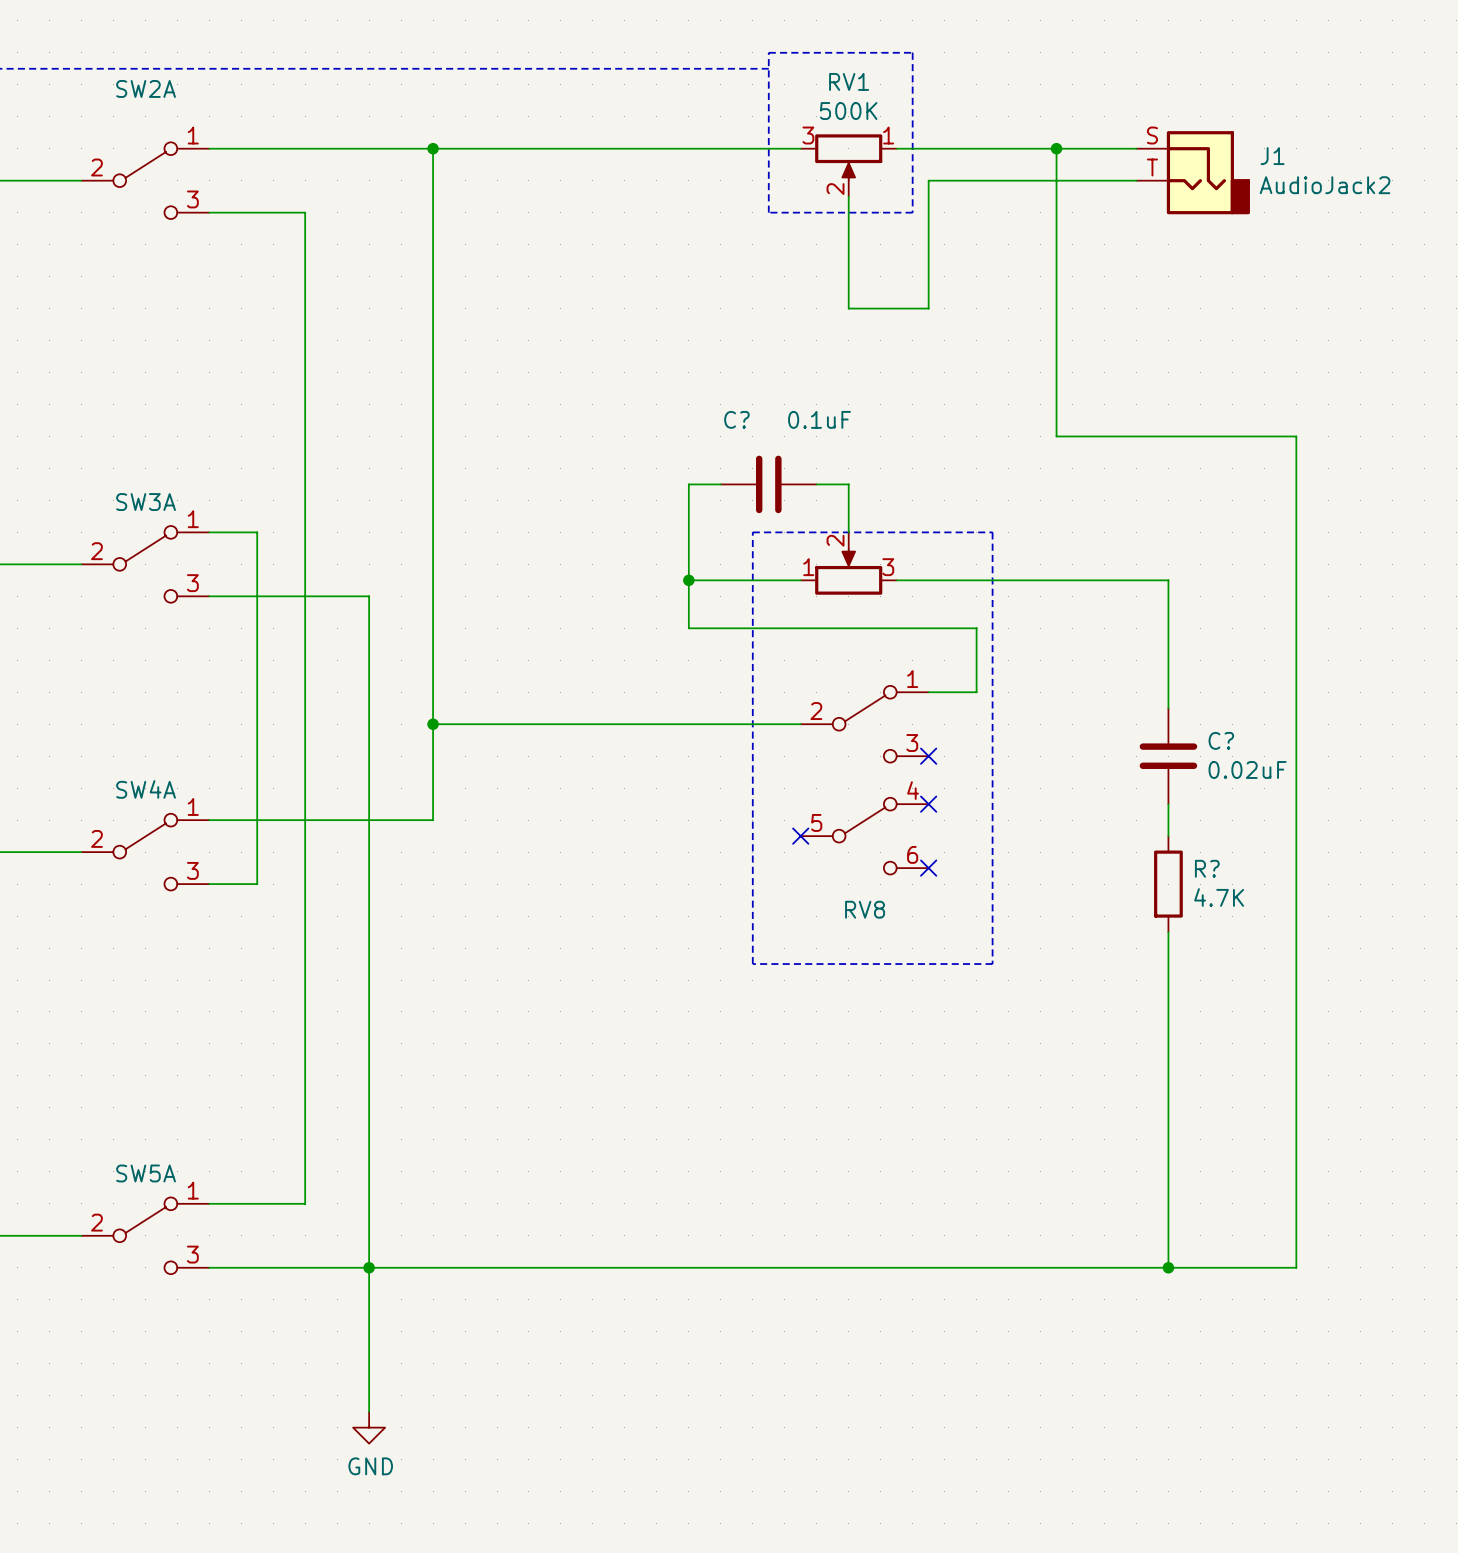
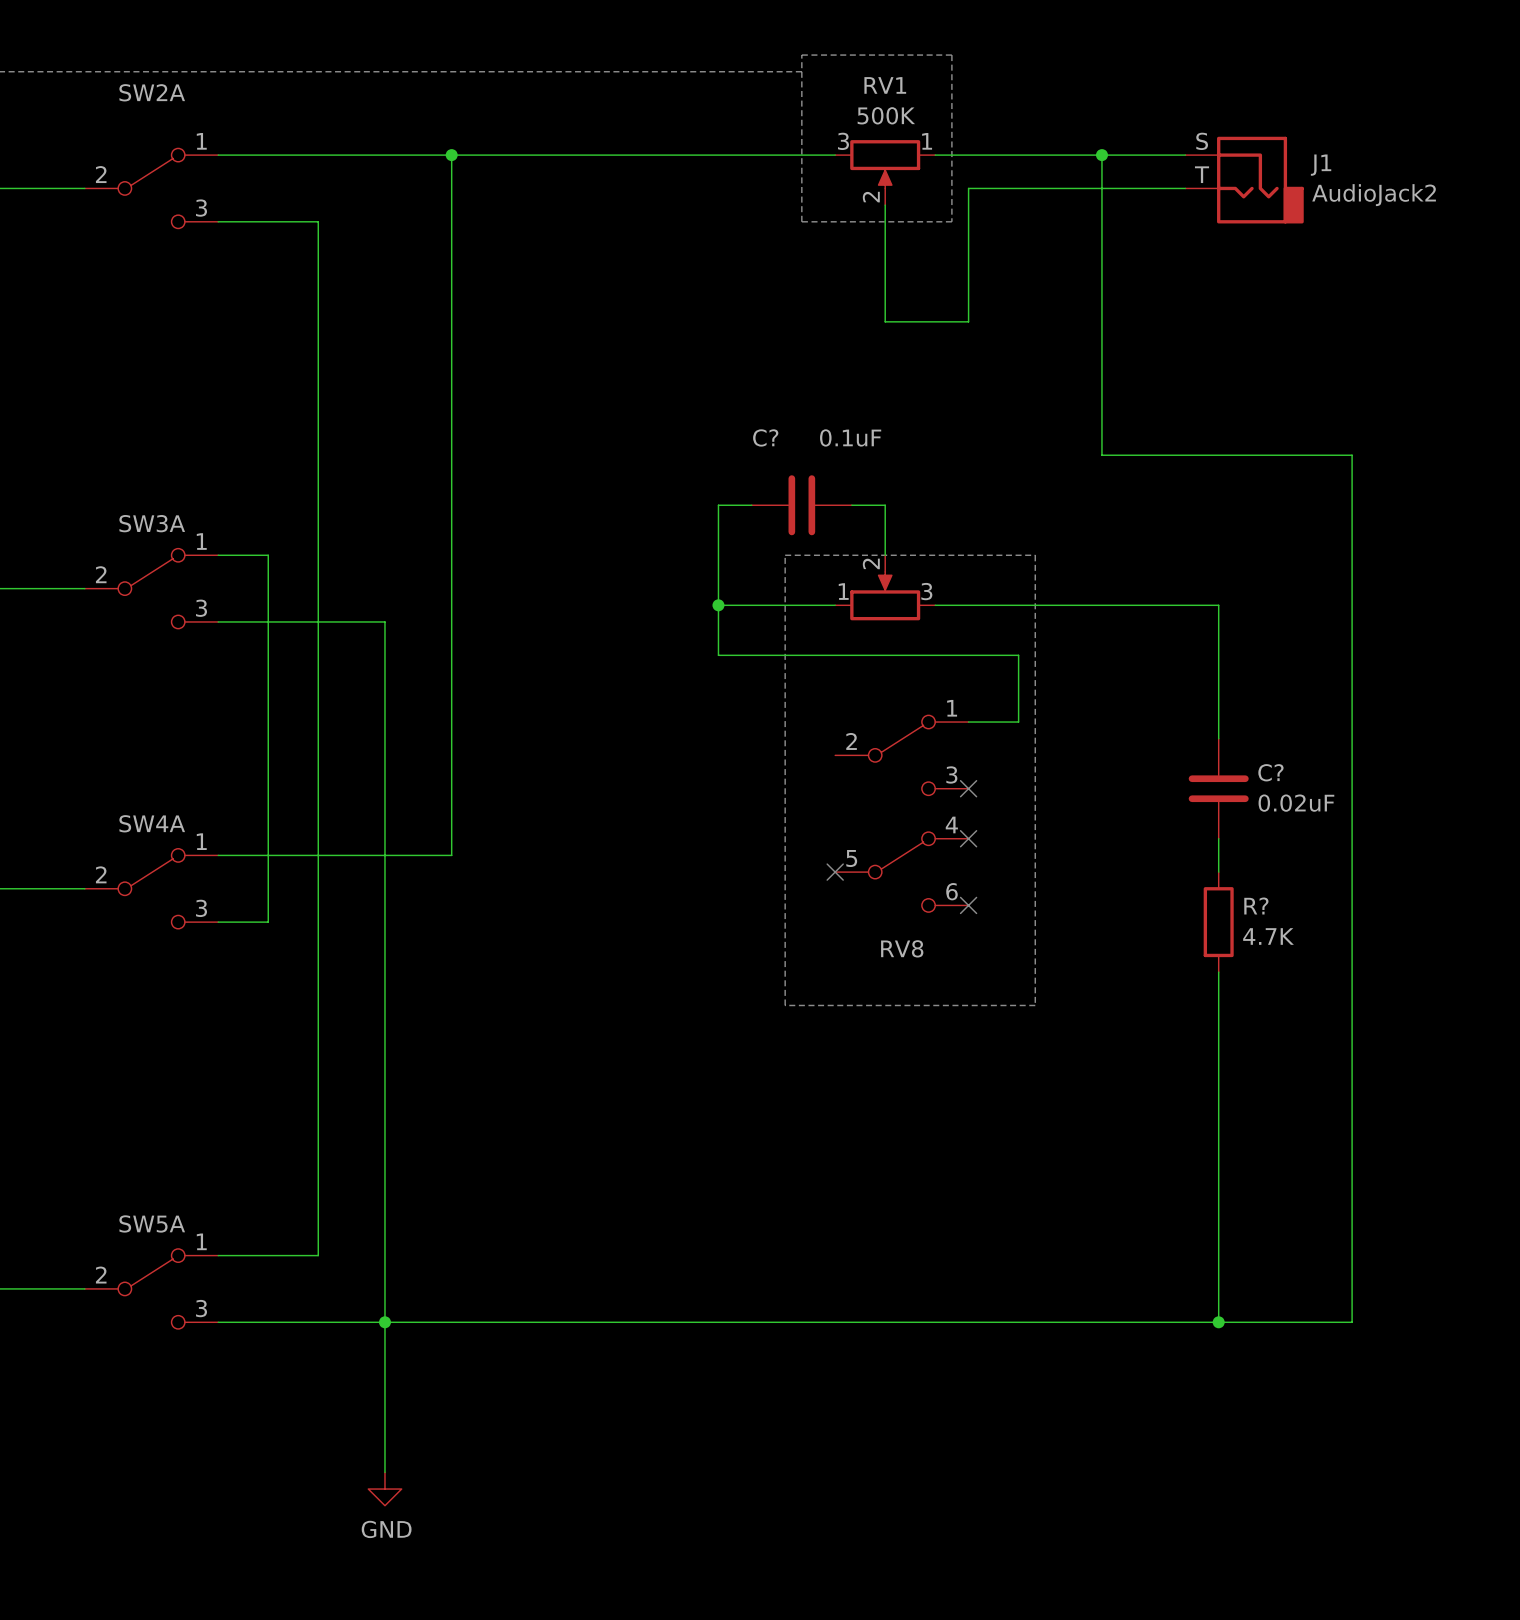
wire: (433, 724) (800, 724) -> none
junction: (433, 724) -> none

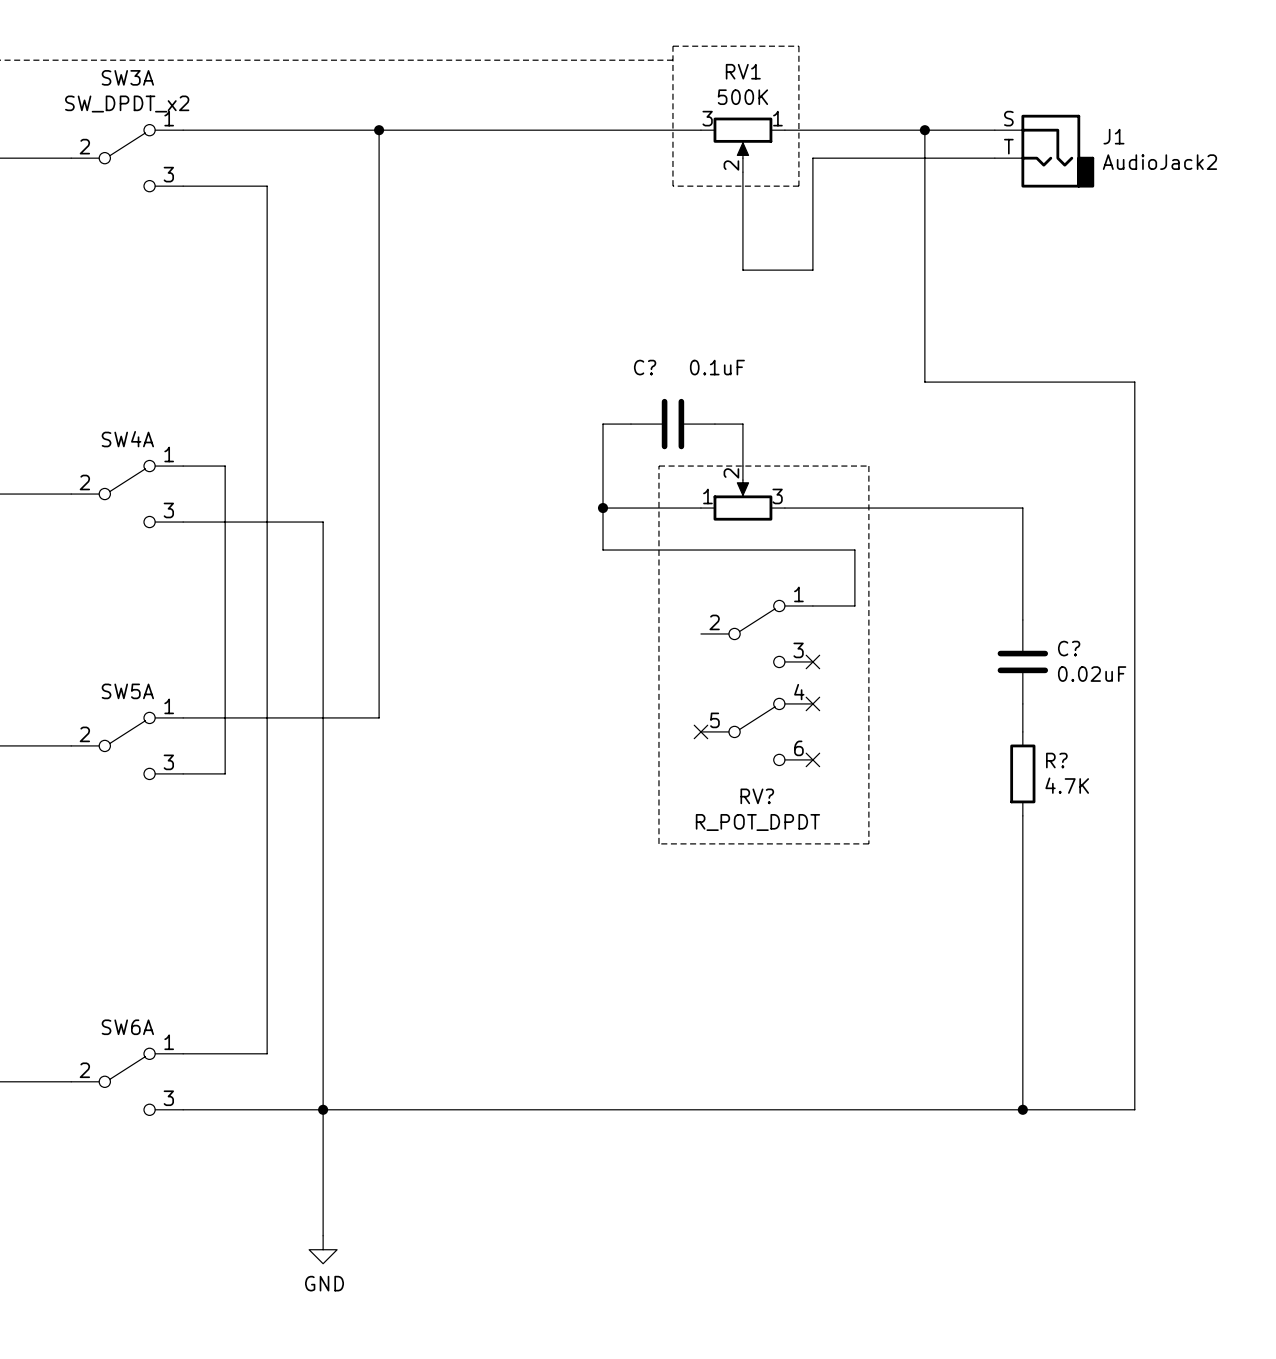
SW2A name: SW2A (152, 92) -> SW3A (127, 77)
SW2A value: none -> SW_DPDT_x2 (127, 104)
SW3A name: SW3A (152, 523) -> SW4A (127, 439)
SW4A name: SW4A (152, 823) -> SW5A (127, 691)
RV8 name: RV8 (902, 948) -> RV? (757, 796)
RV8 value: none -> R_POT_DPDT (757, 822)
SW5A name: SW5A (152, 1223) -> SW6A (127, 1027)

